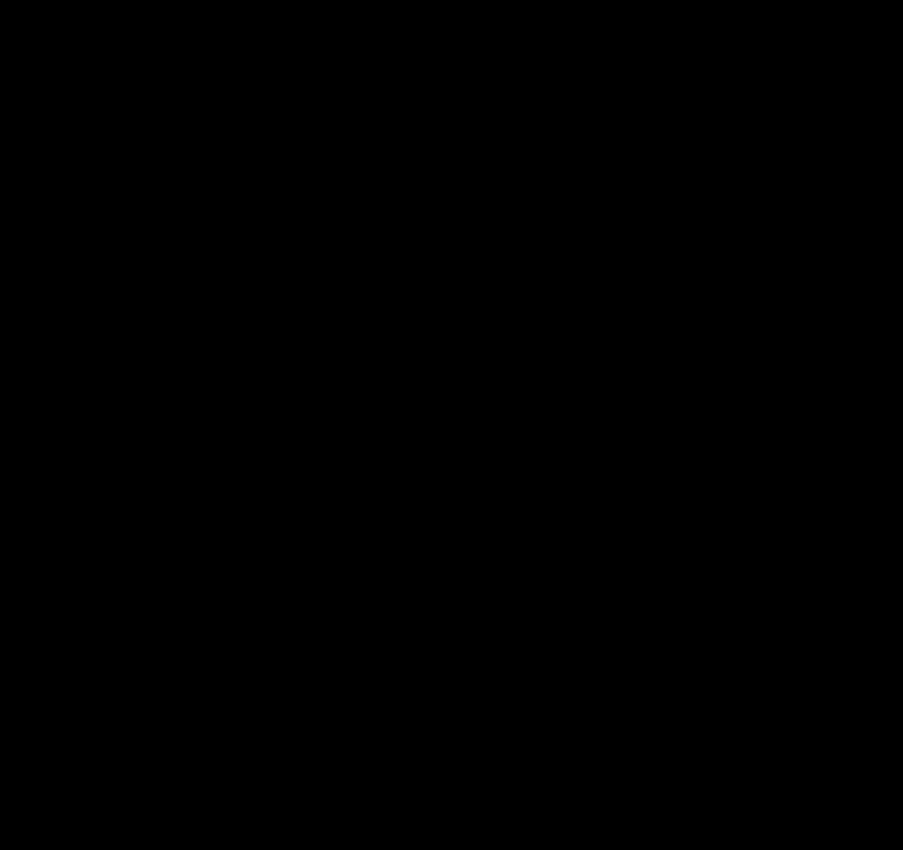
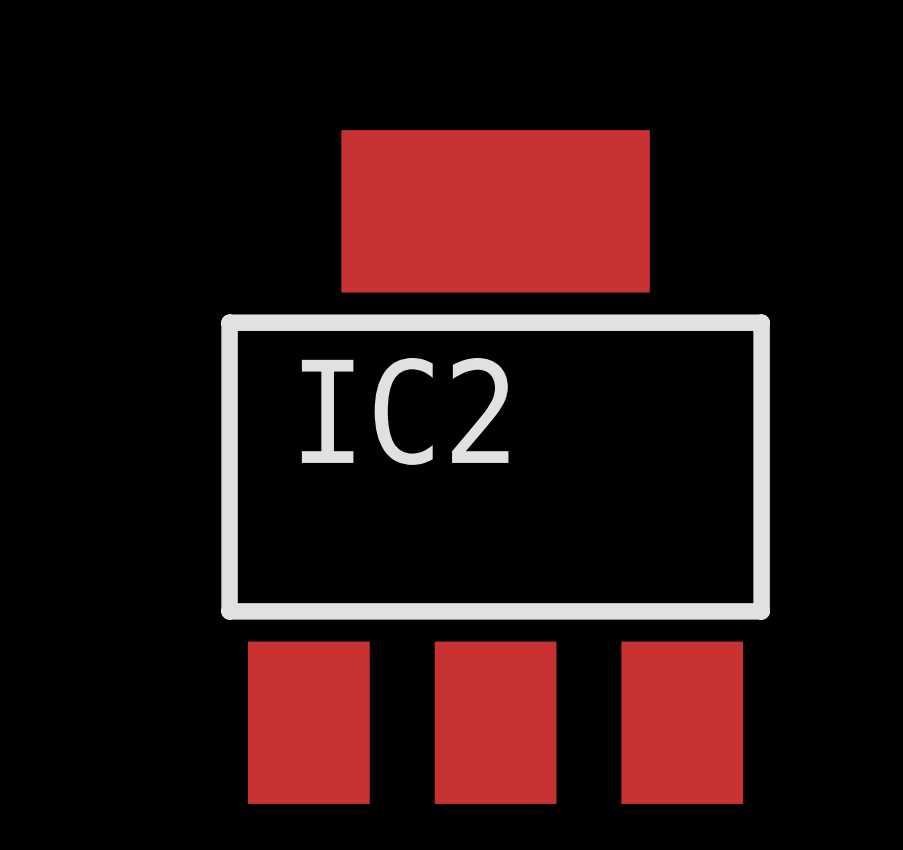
IC2: none -> (495, 467)

